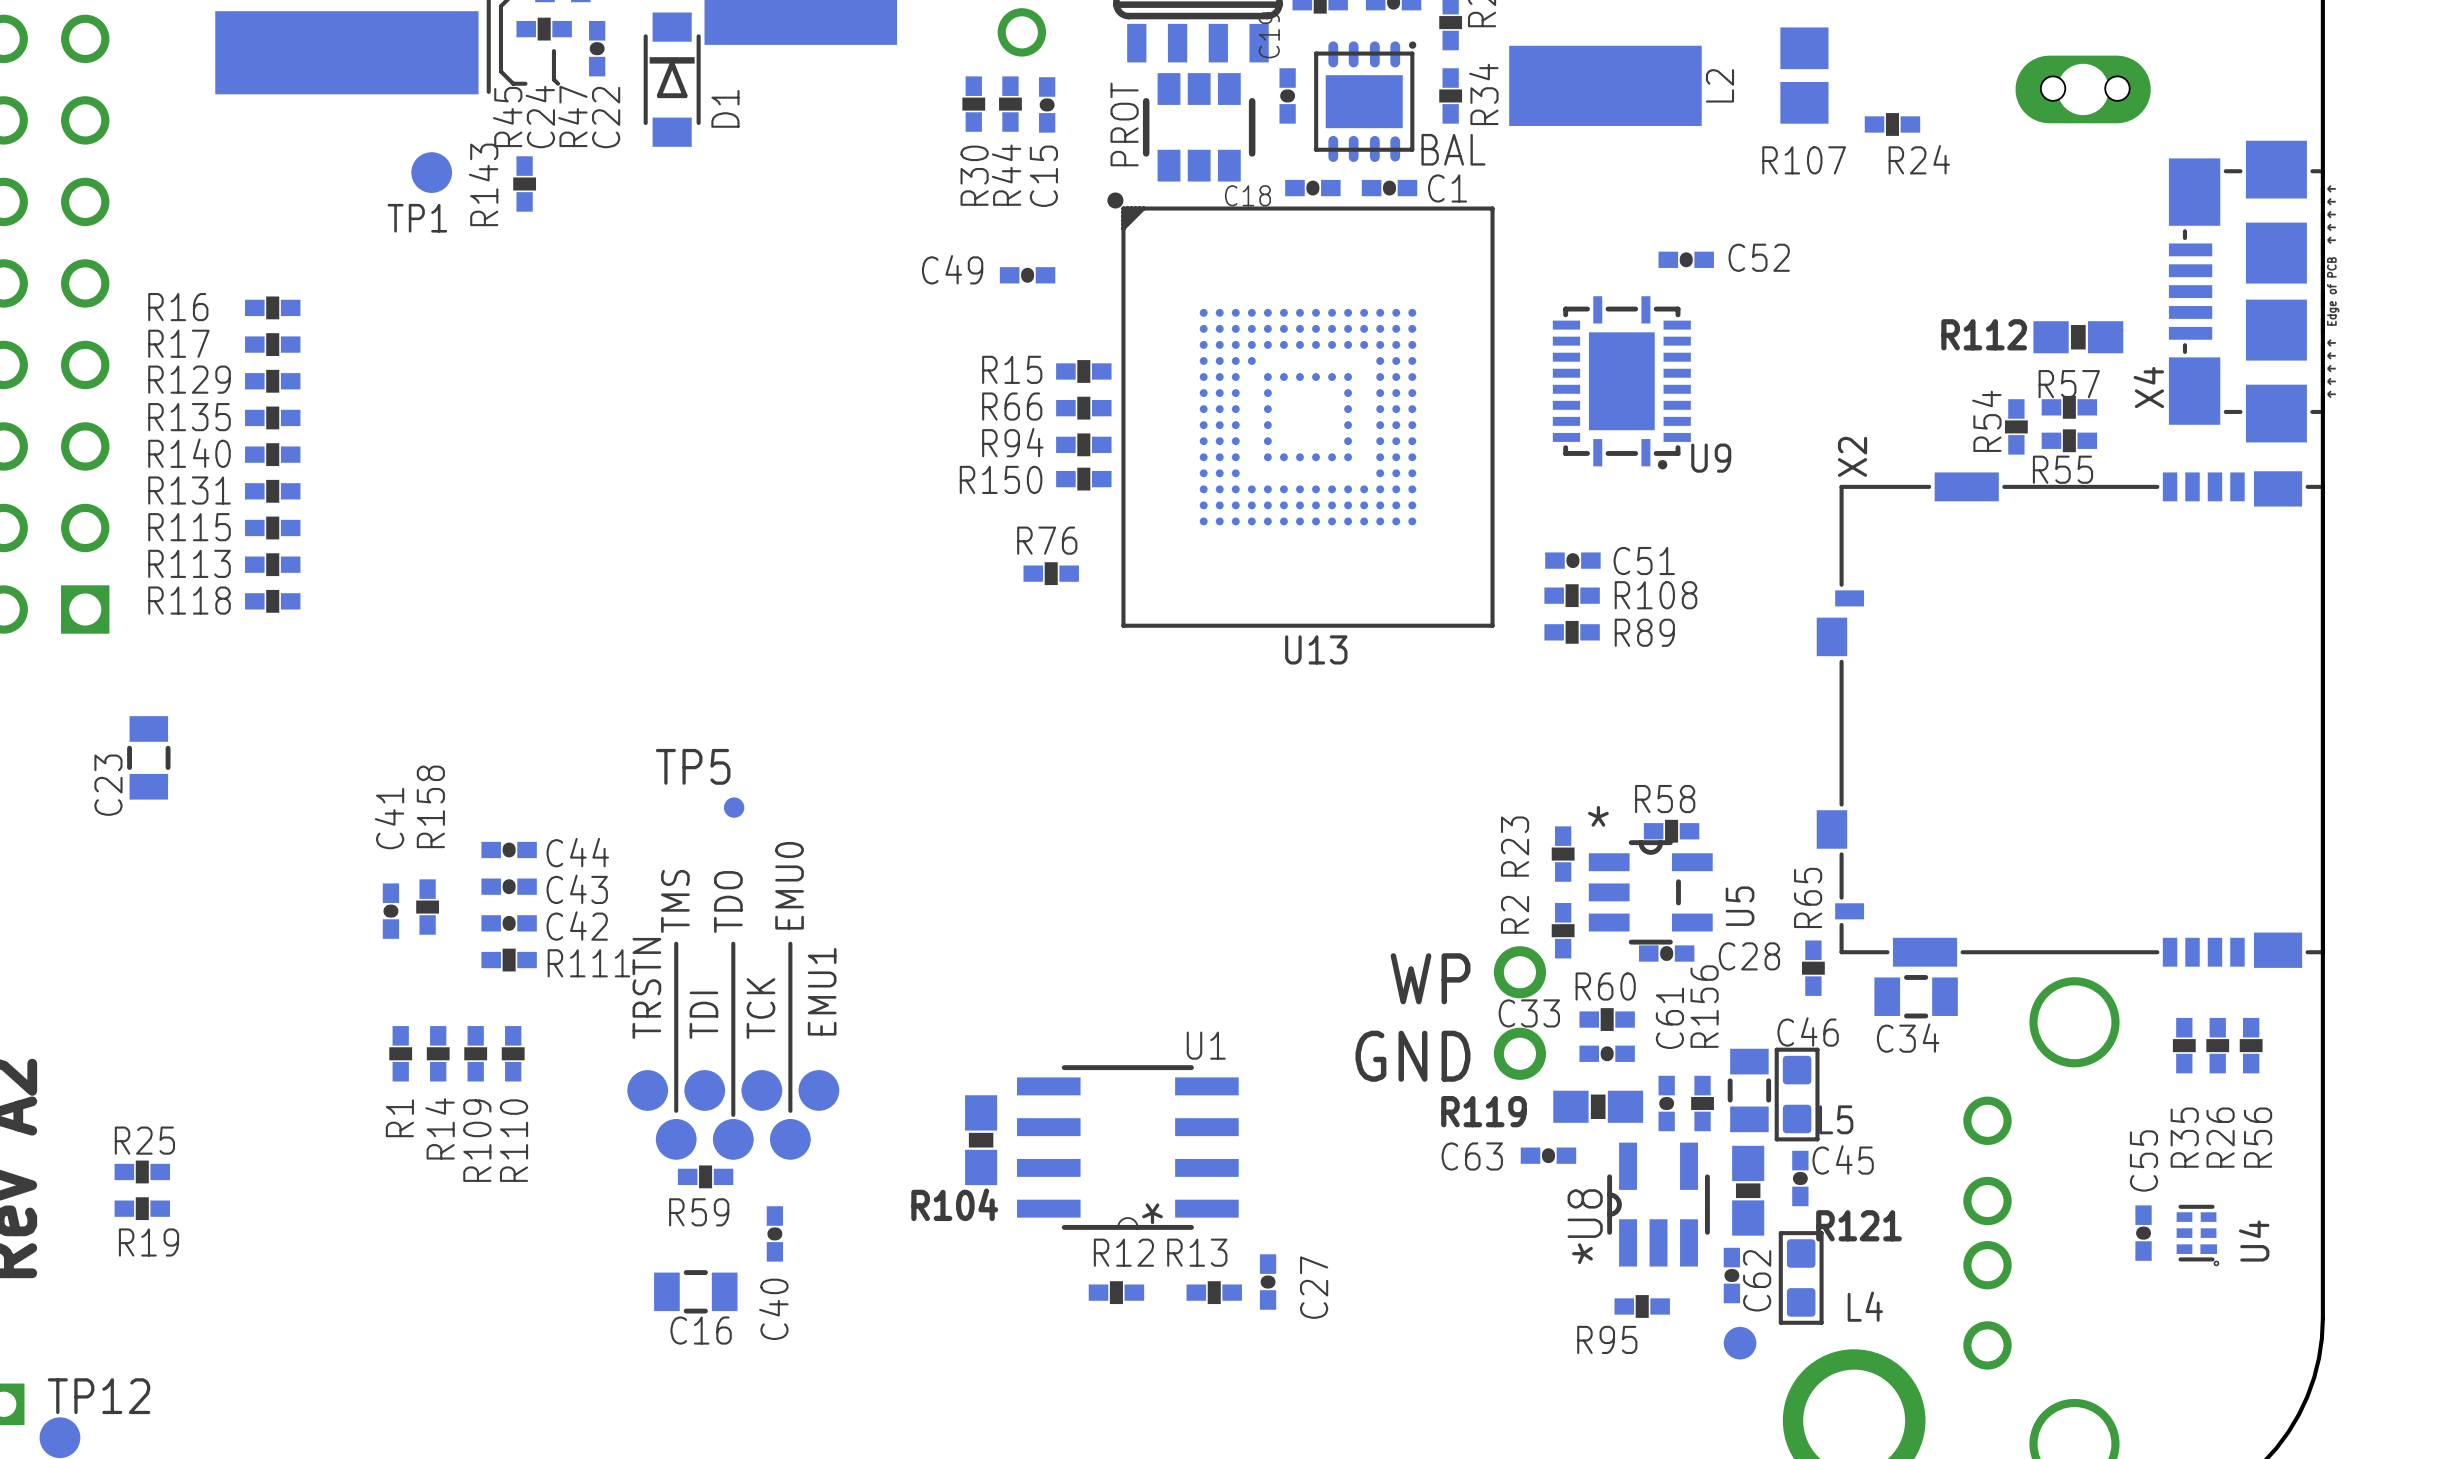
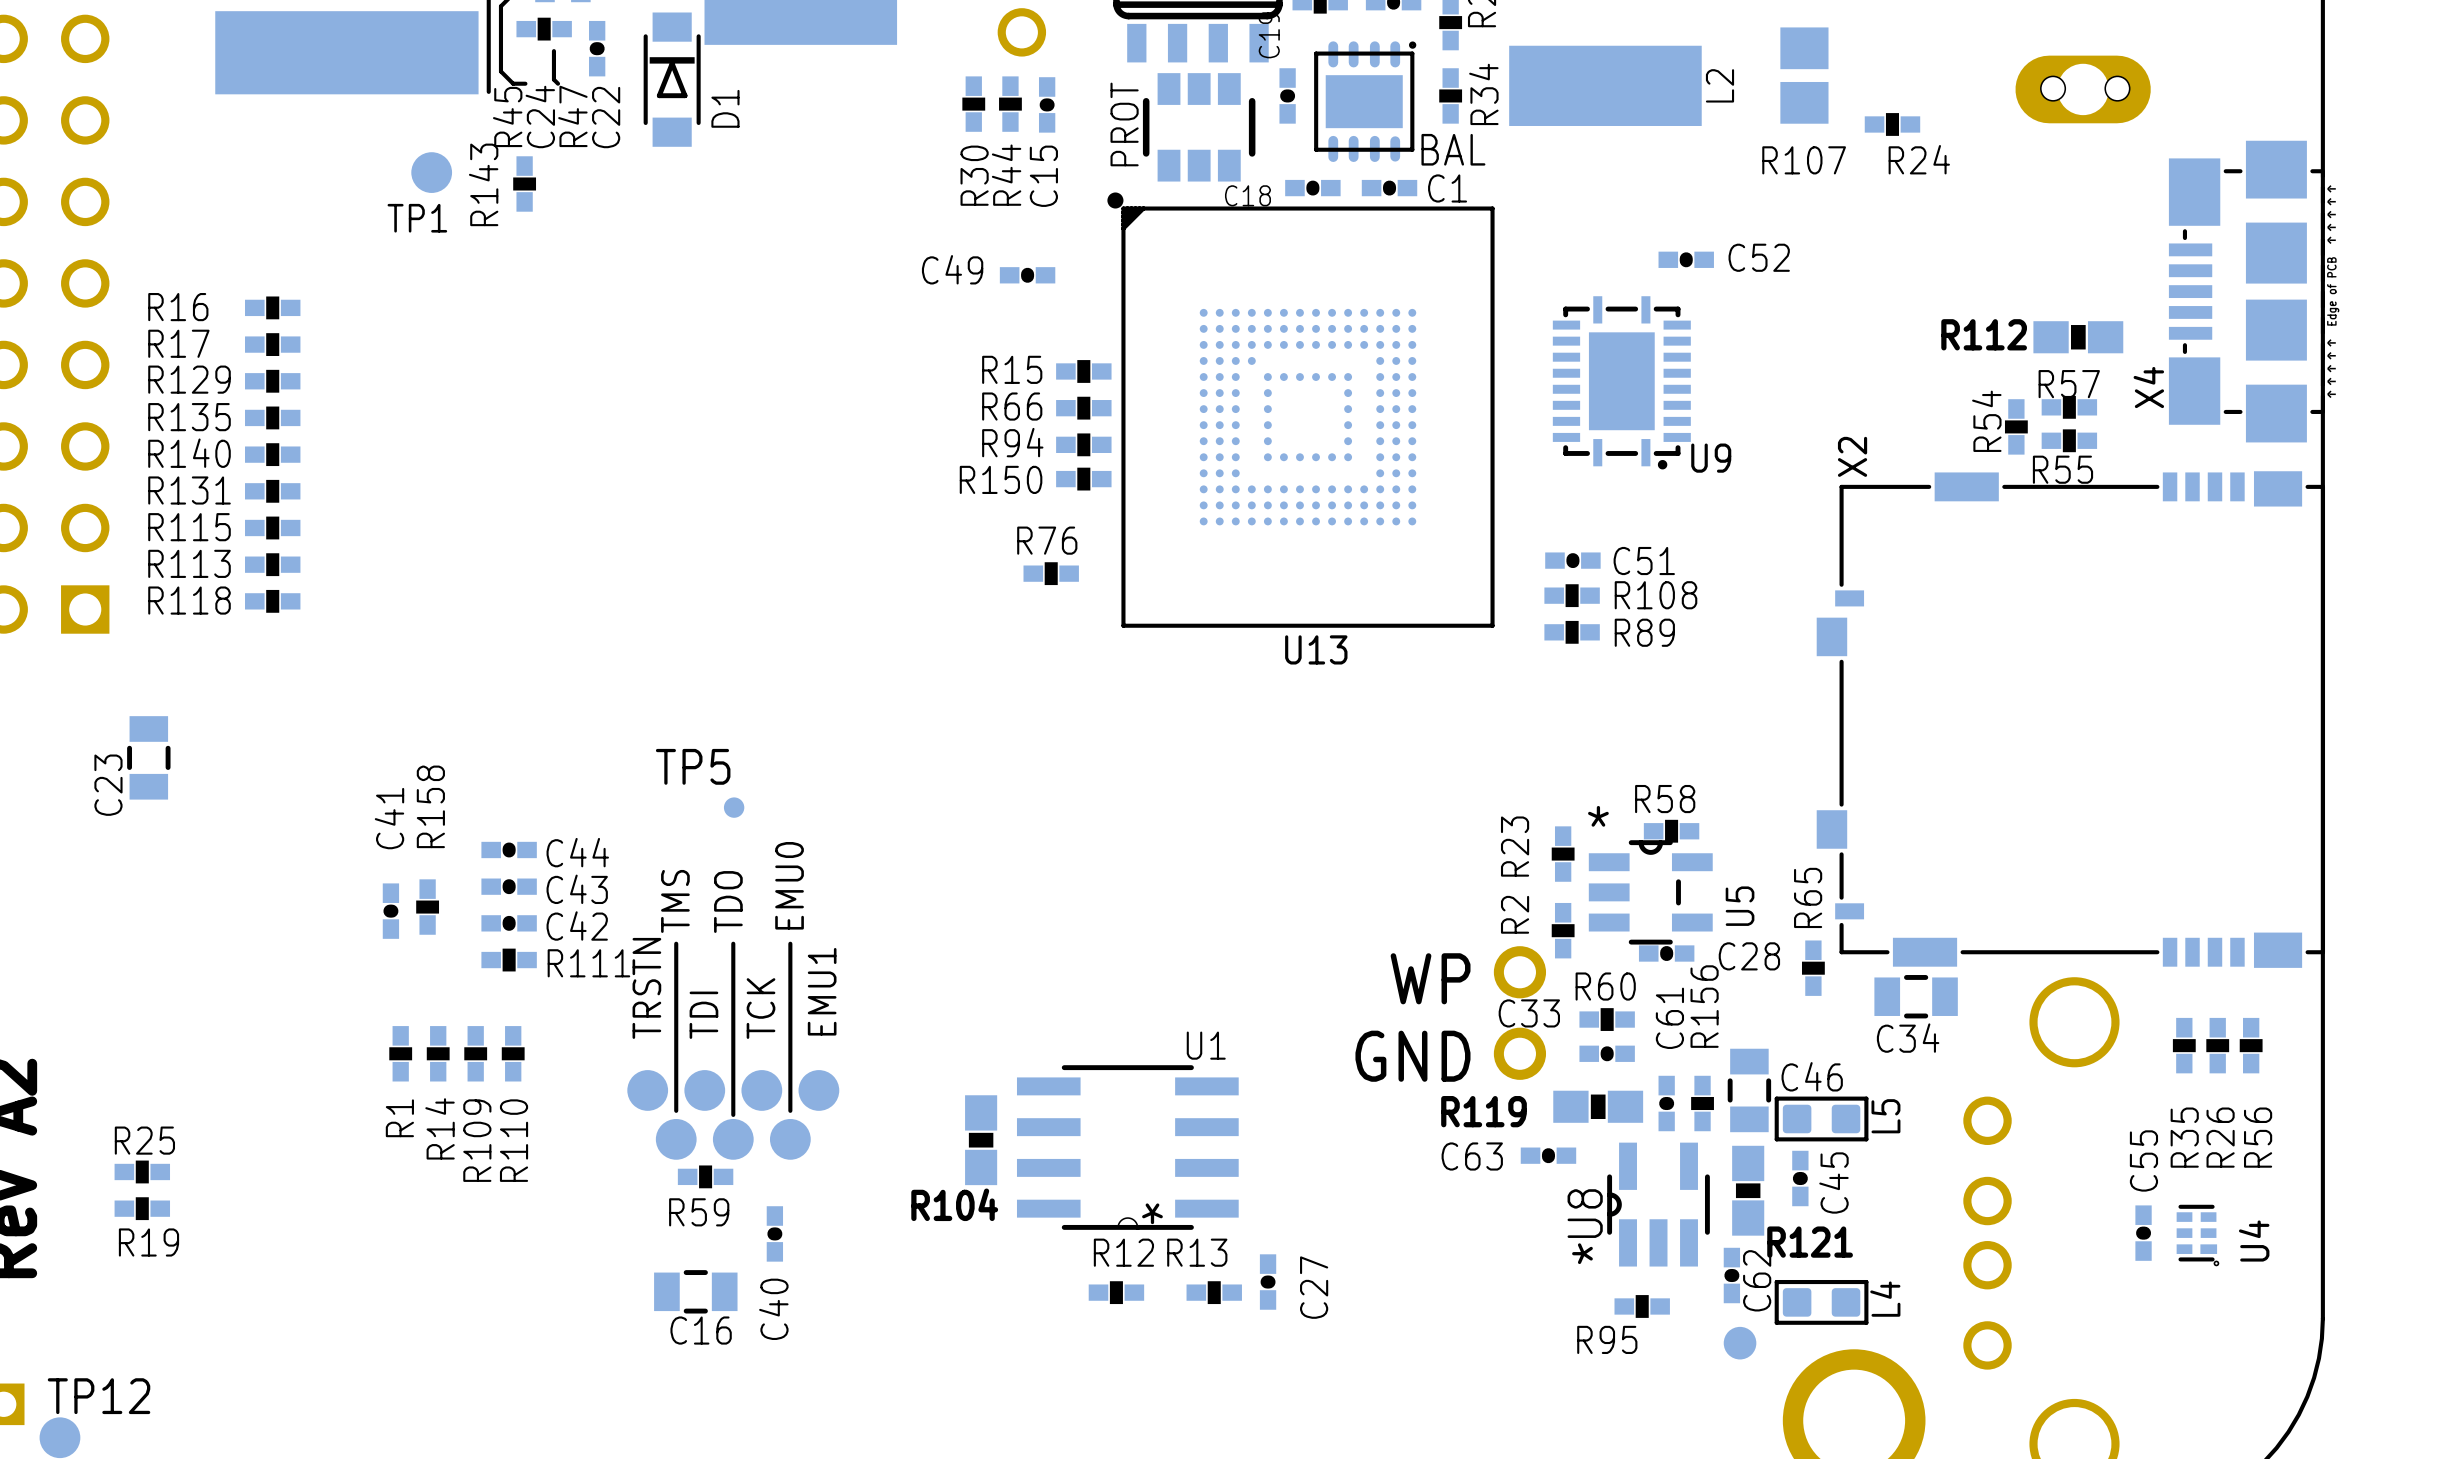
C46 name position: C46 (1808, 1031) -> C46 (1812, 1076)
L5 rotation: 0° (1797, 1094) -> 90° clockwise (1821, 1118)
C45 name rotation: 0° (1843, 1159) -> 90° counterclockwise (1833, 1182)
R121 name position: R121 (1859, 1225) -> R121 (1810, 1242)
L4 rotation: 0° (1801, 1277) -> 90° clockwise (1821, 1302)

